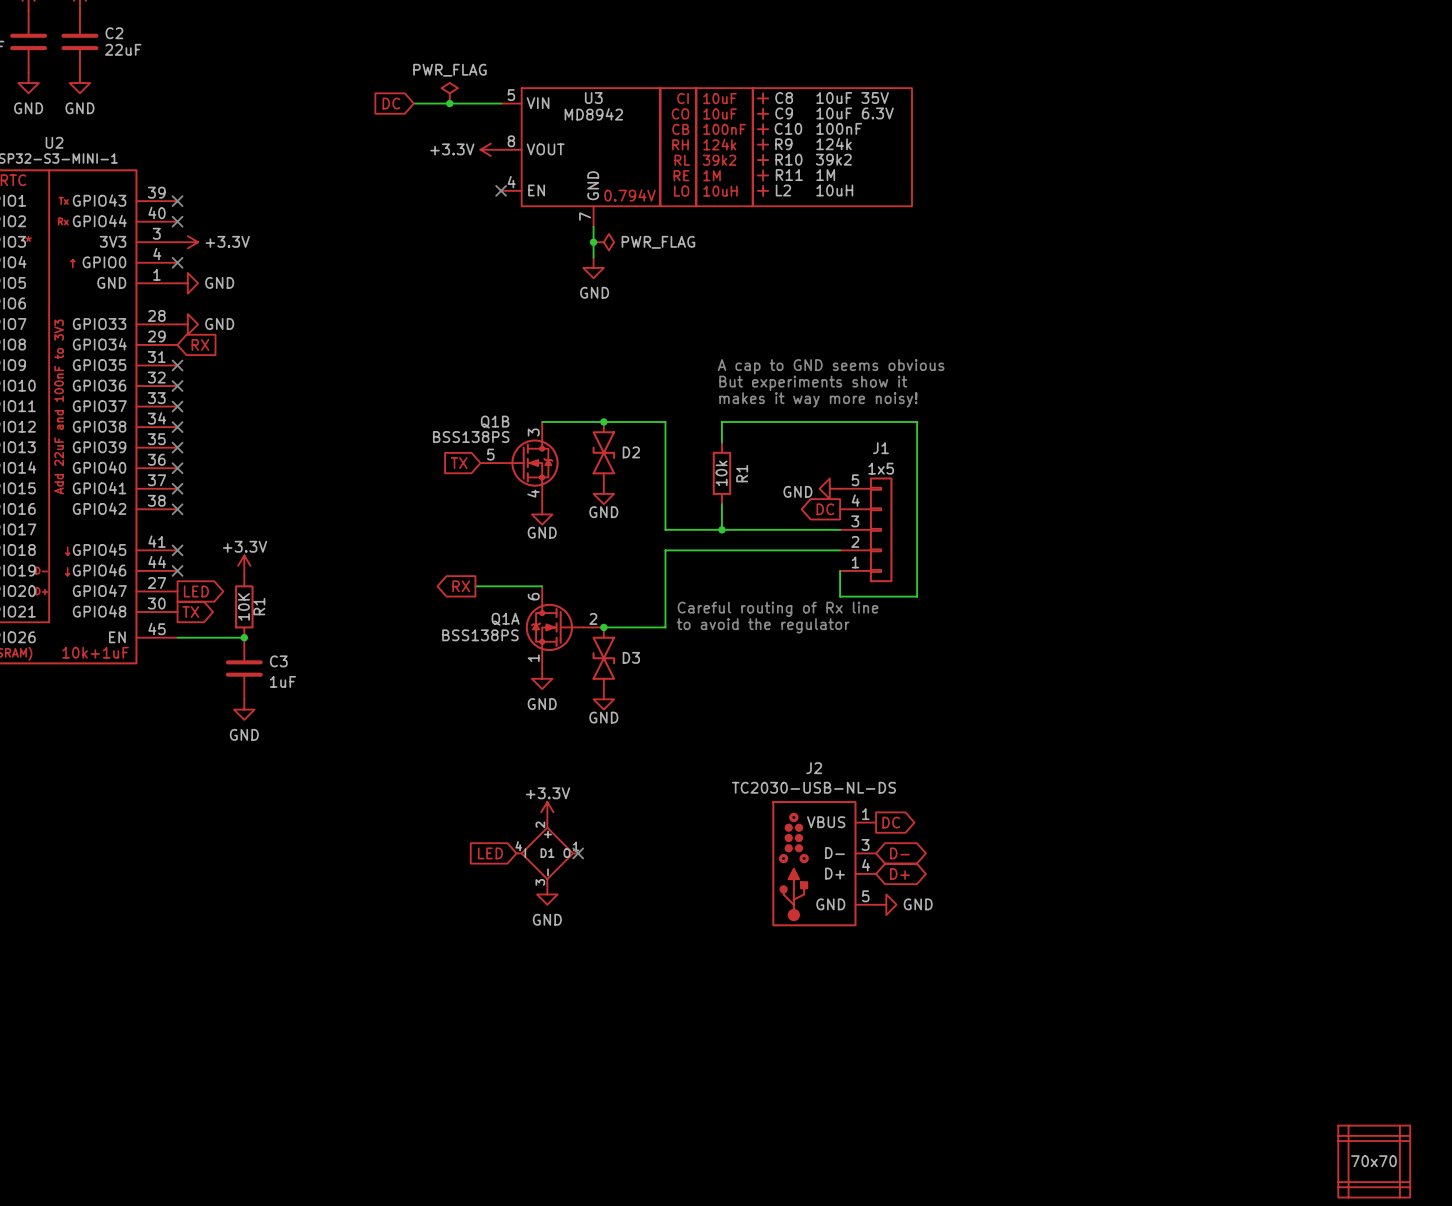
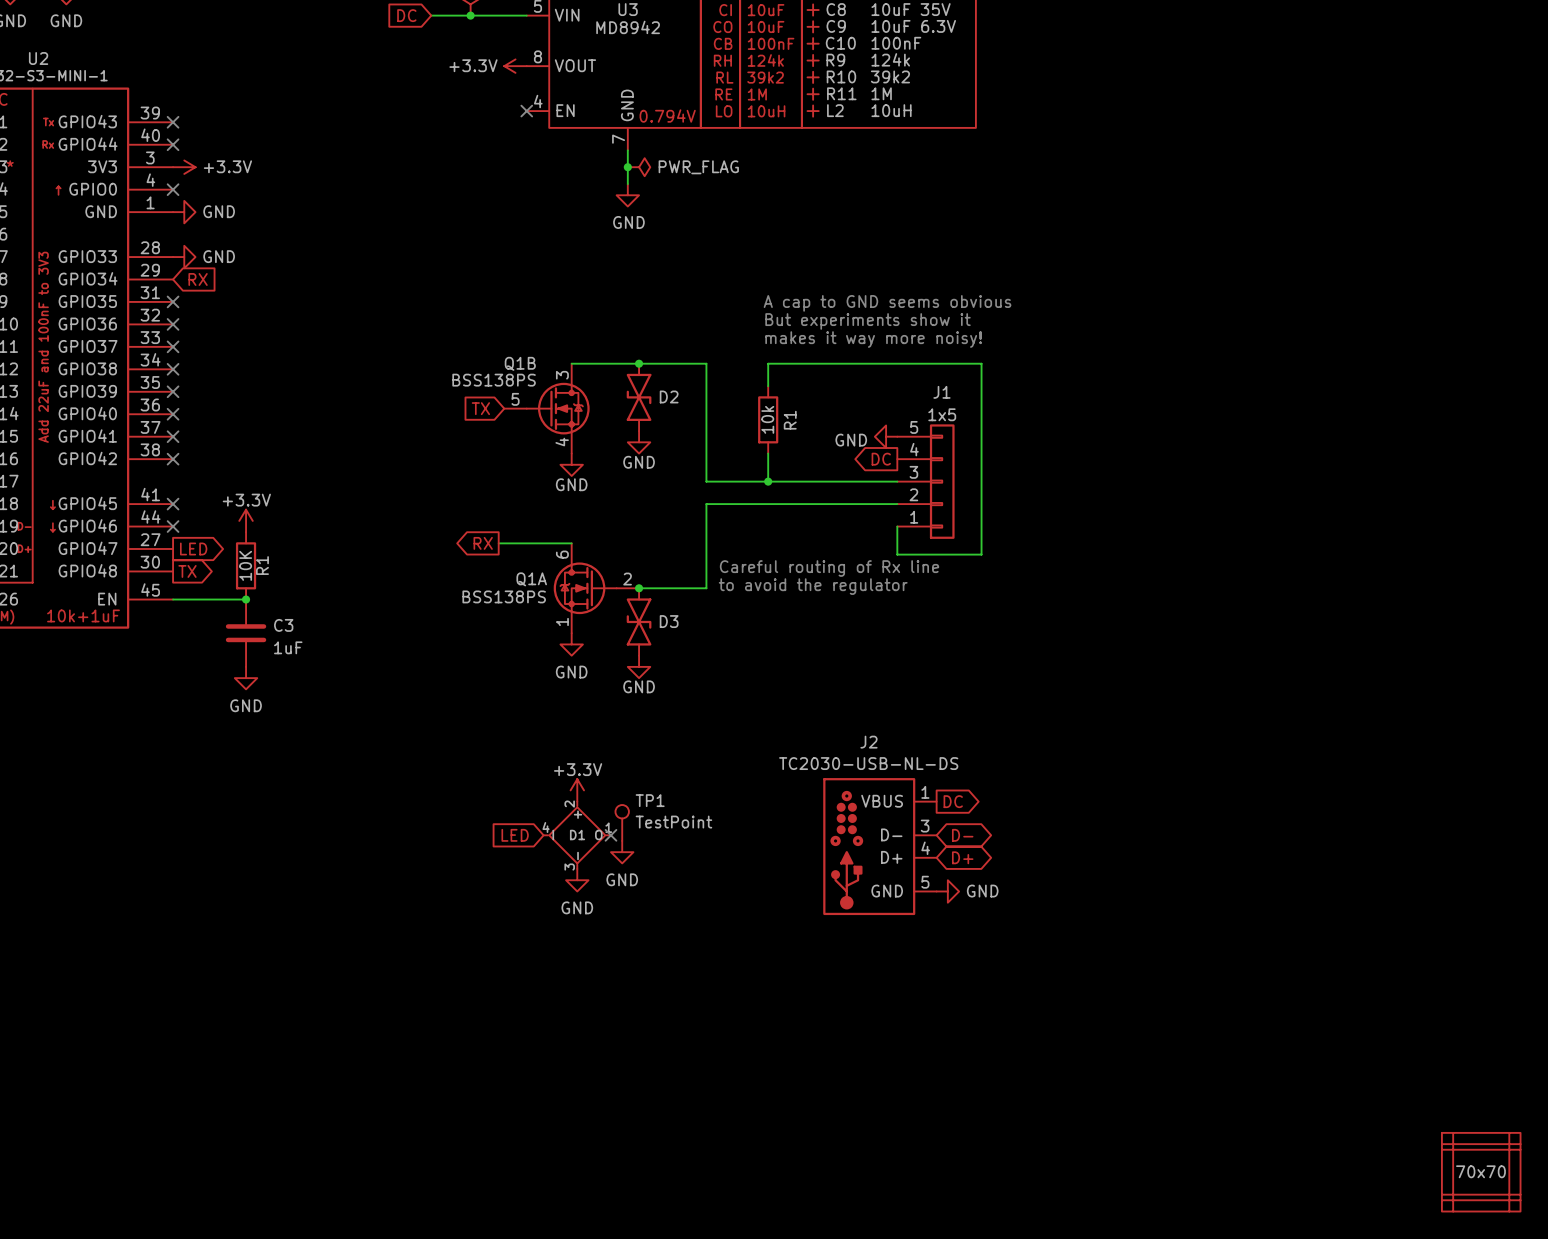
TP1: none -> TestPoint (622, 822)
power symbol: none -> GND (622, 852)

